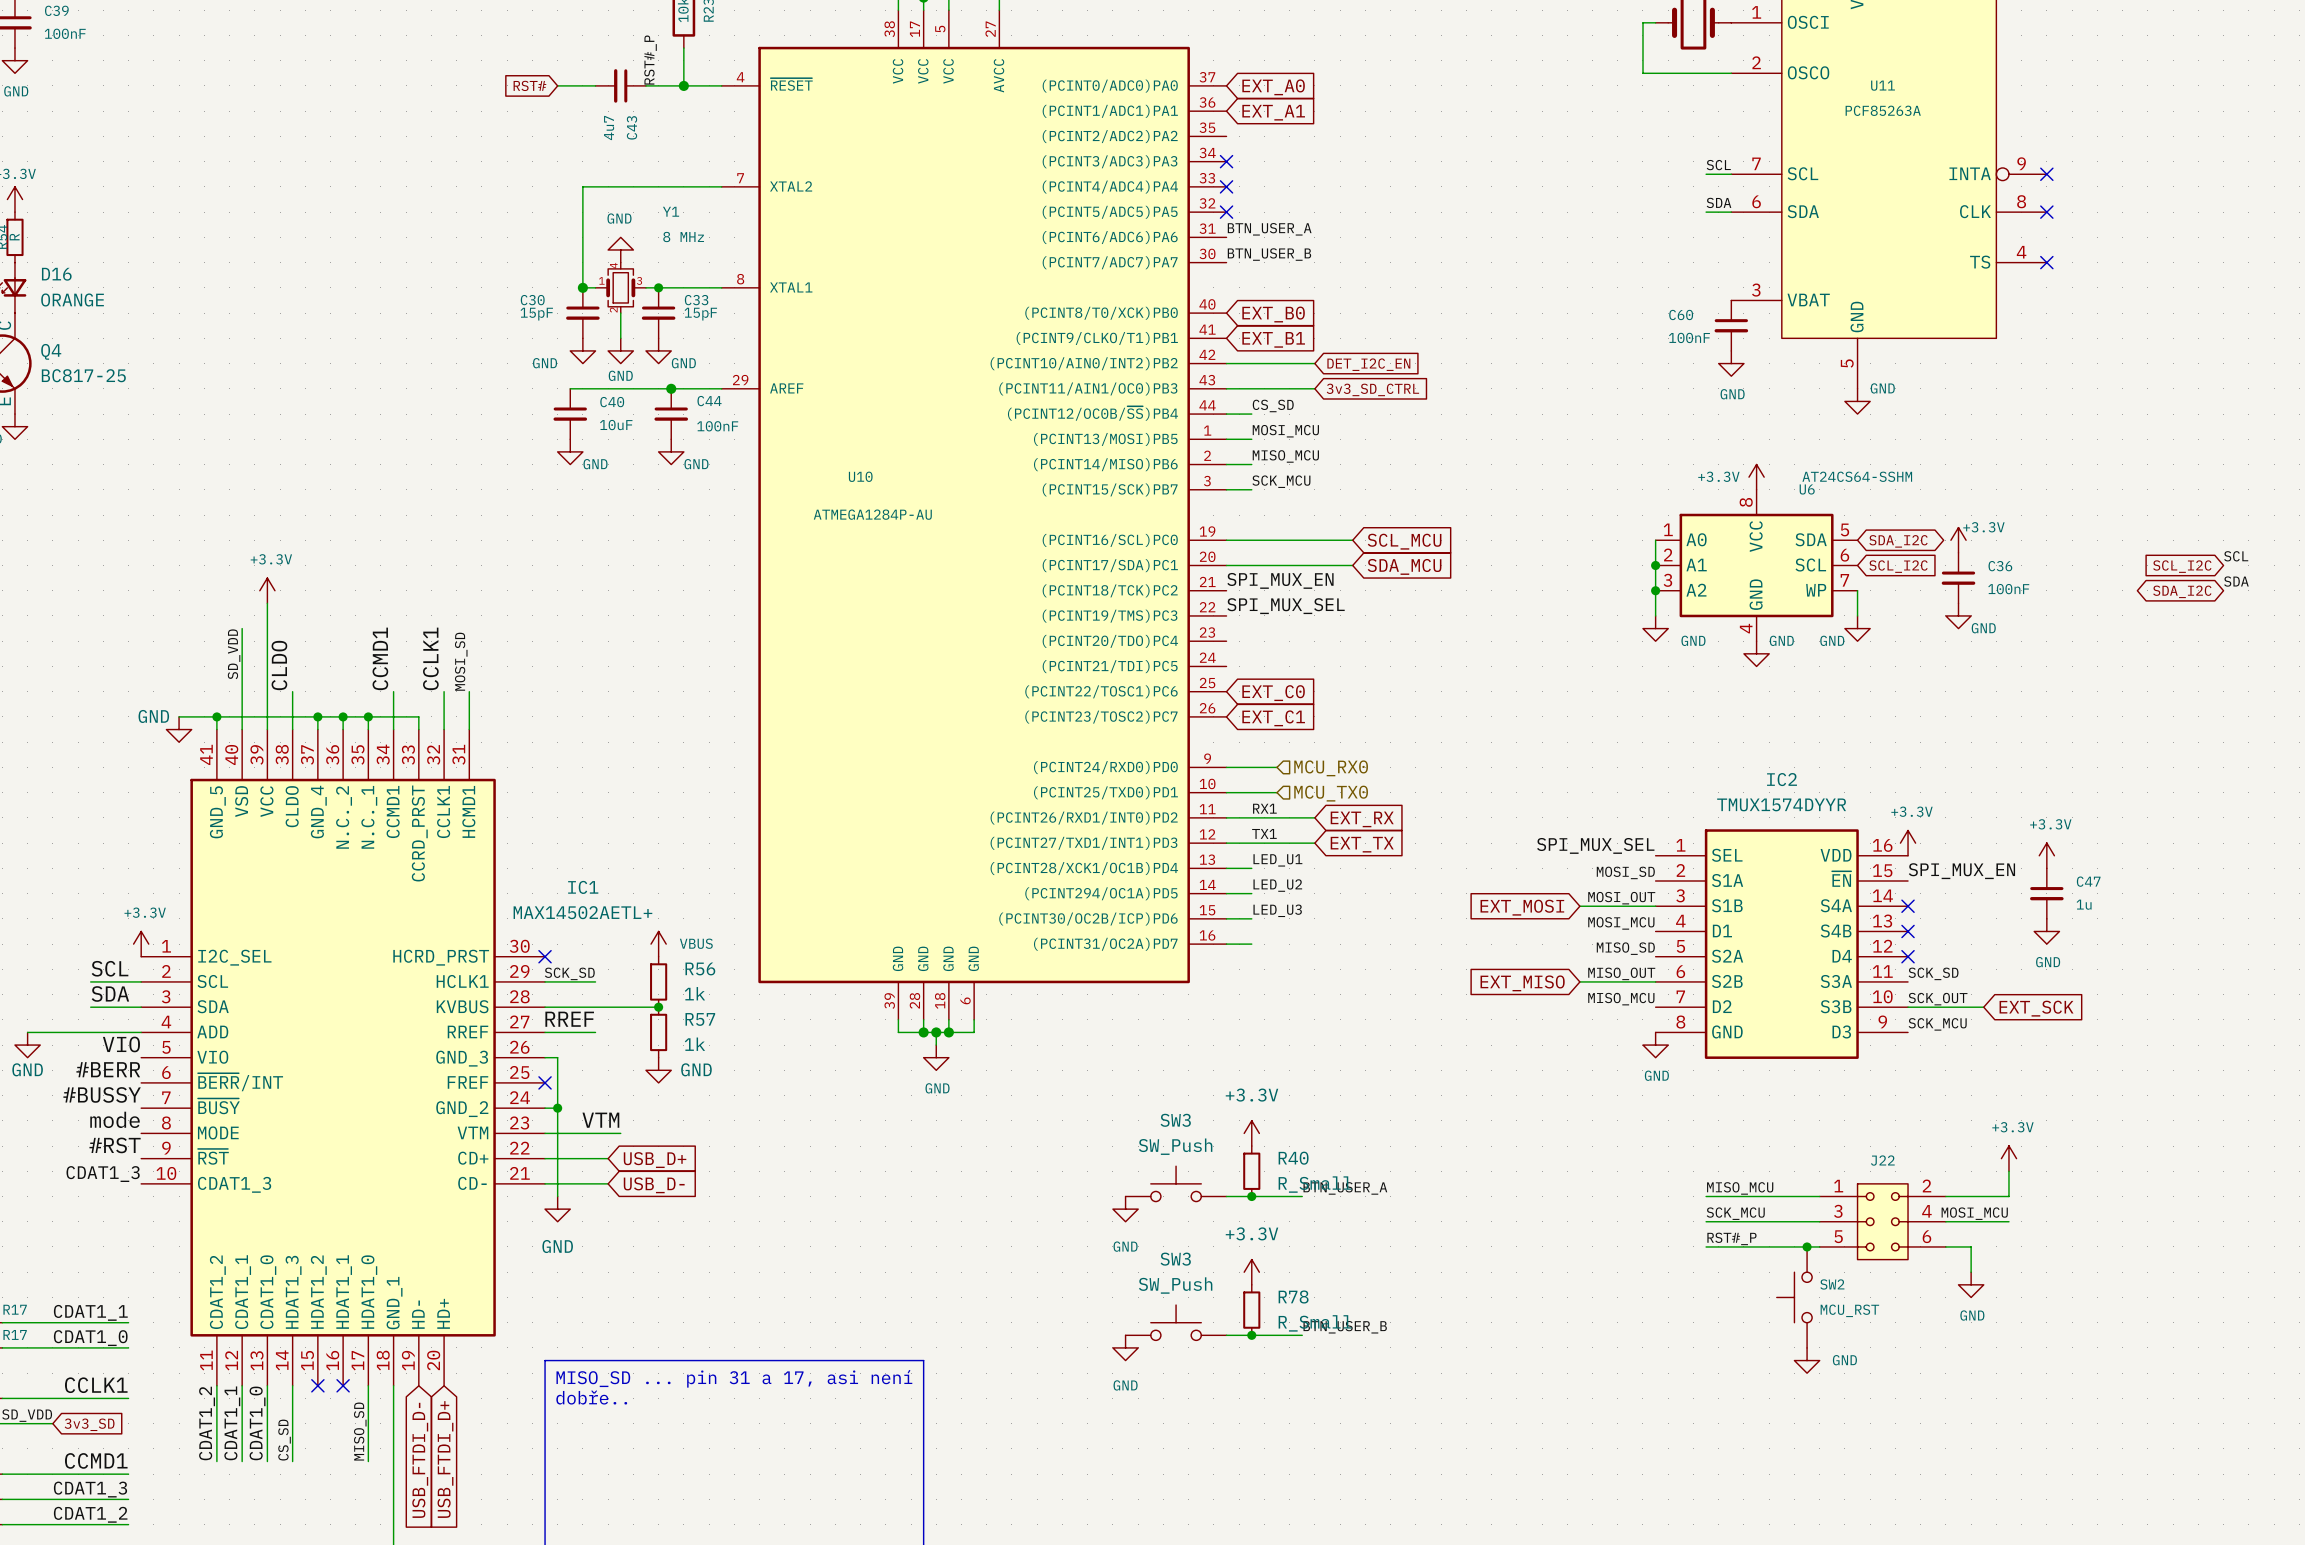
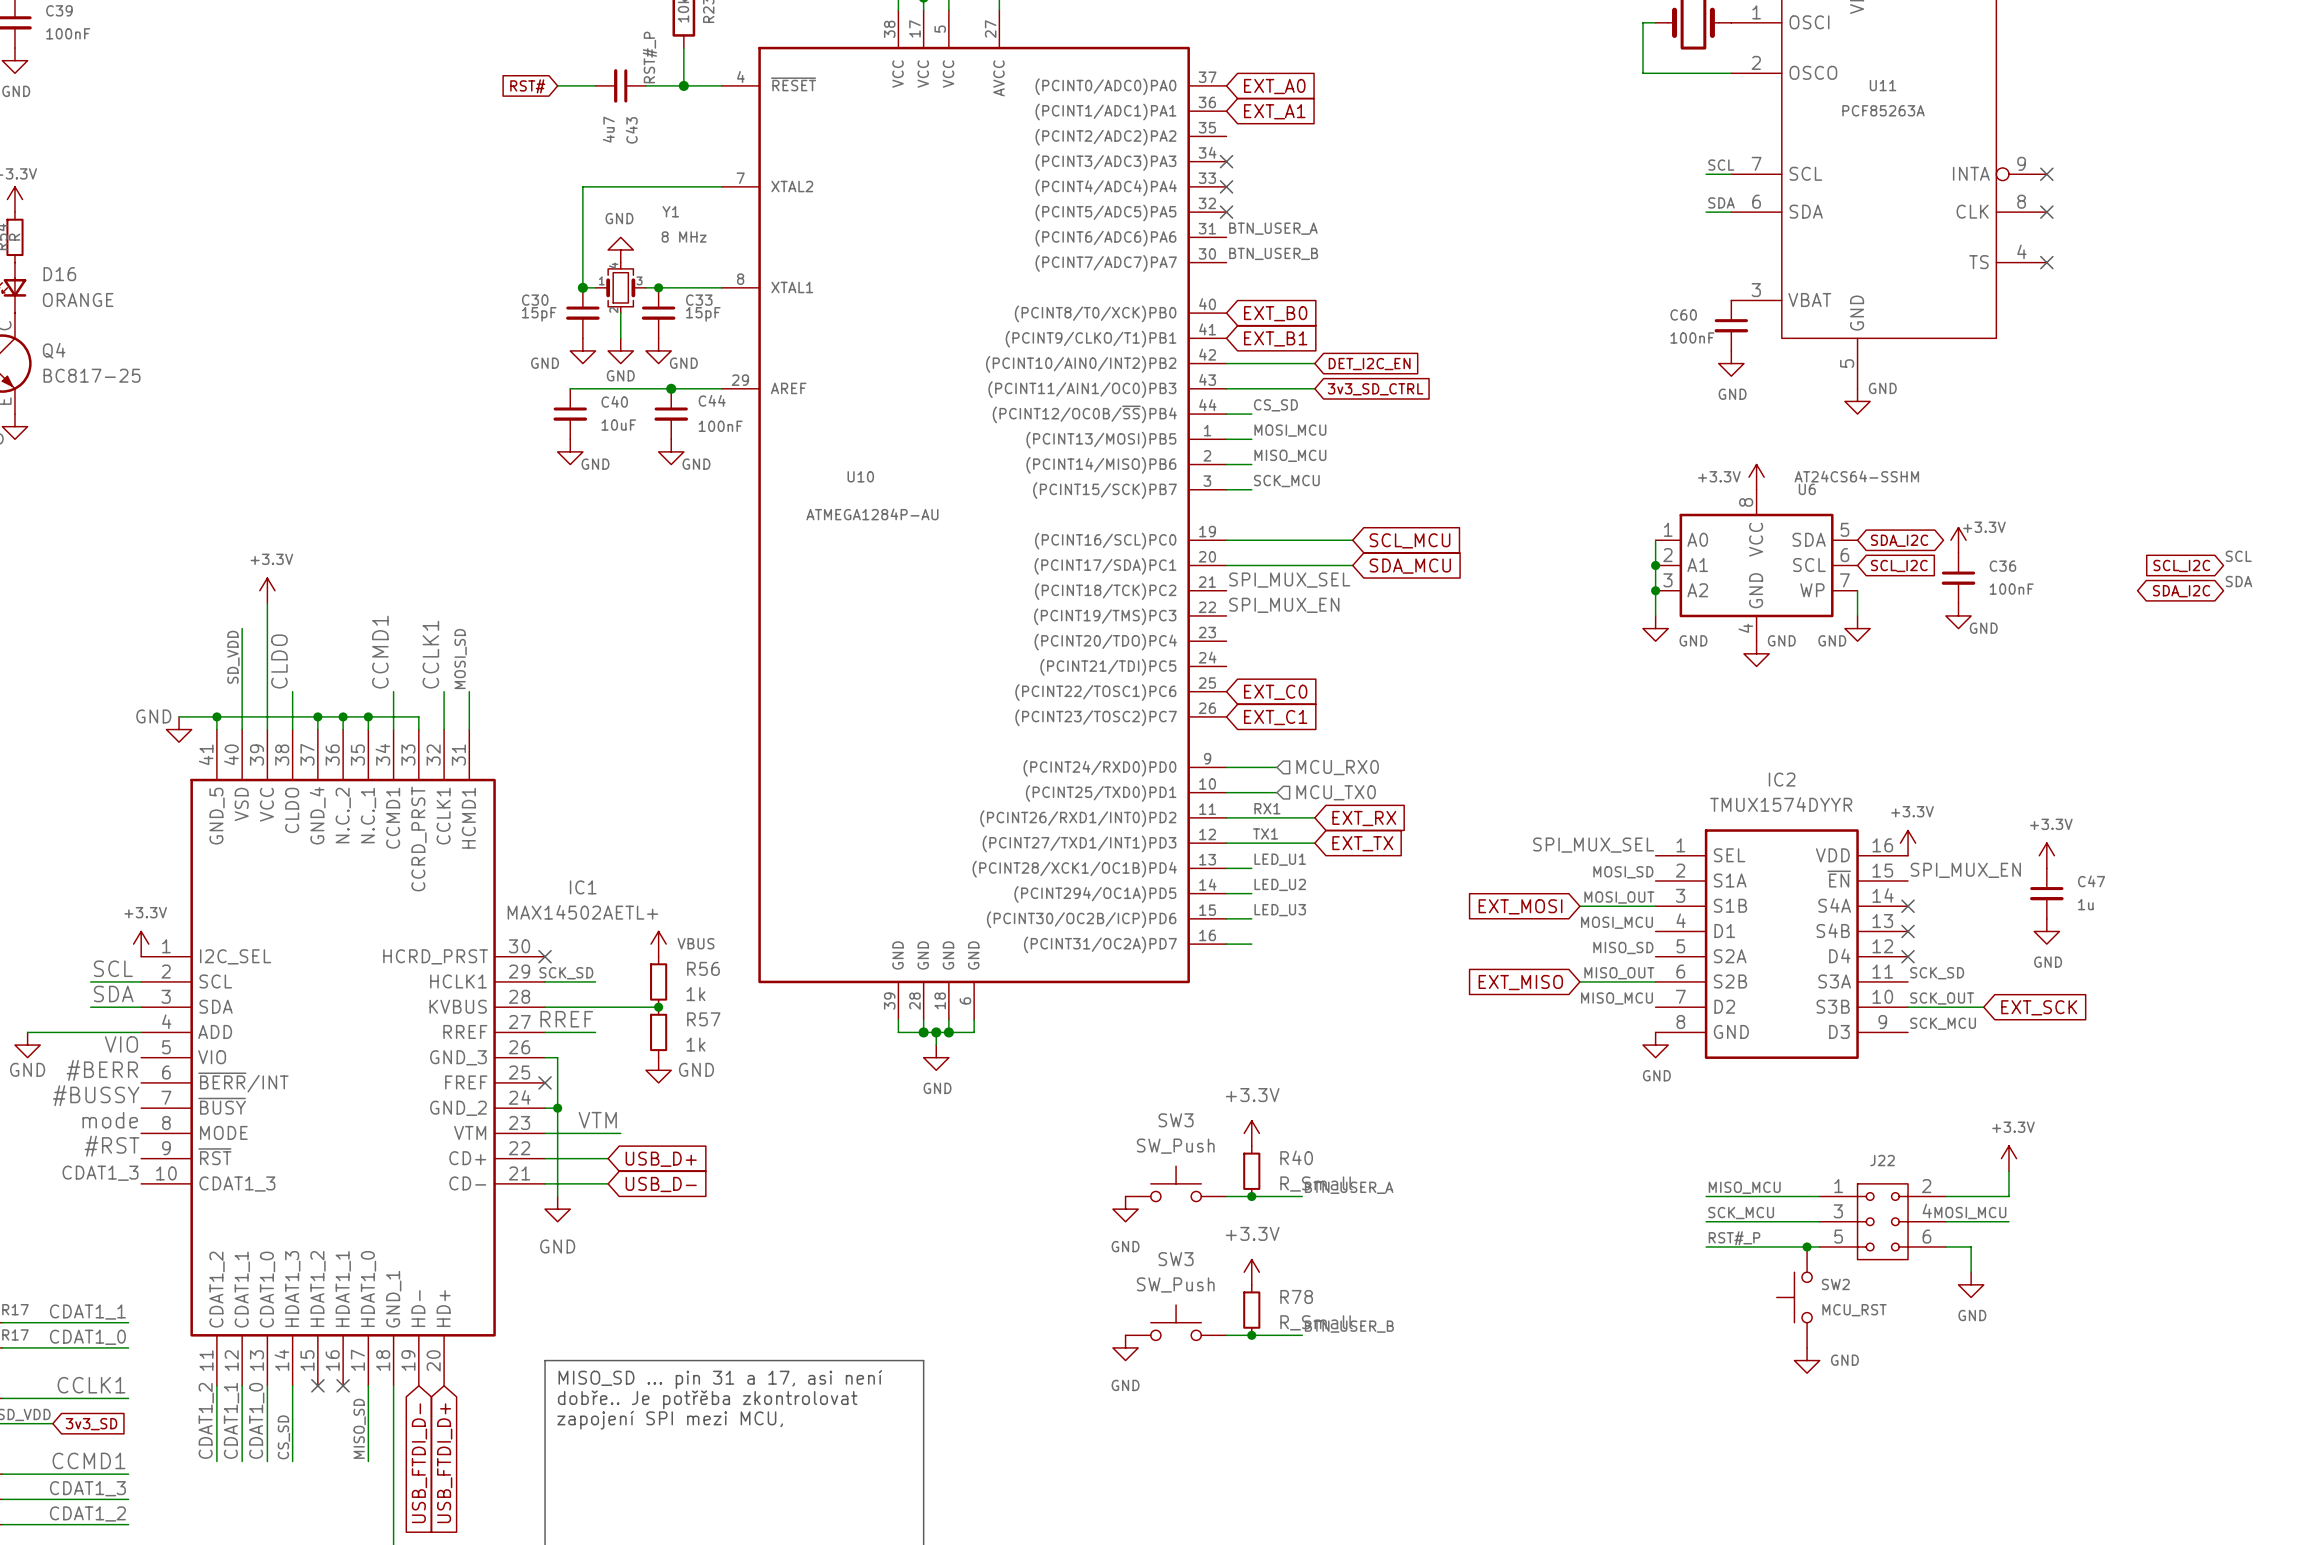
label: SPI_MUX_EN (1280, 580) -> SPI_MUX_SEL (1289, 580)
label: SPI_MUX_SEL (1286, 606) -> SPI_MUX_EN (1284, 605)
text: dobře.. (591, 1397) -> dobře.. Je potřěba zkontrolovat (707, 1399)
text: none -> zapojení SPI mezi MCU, (670, 1420)

